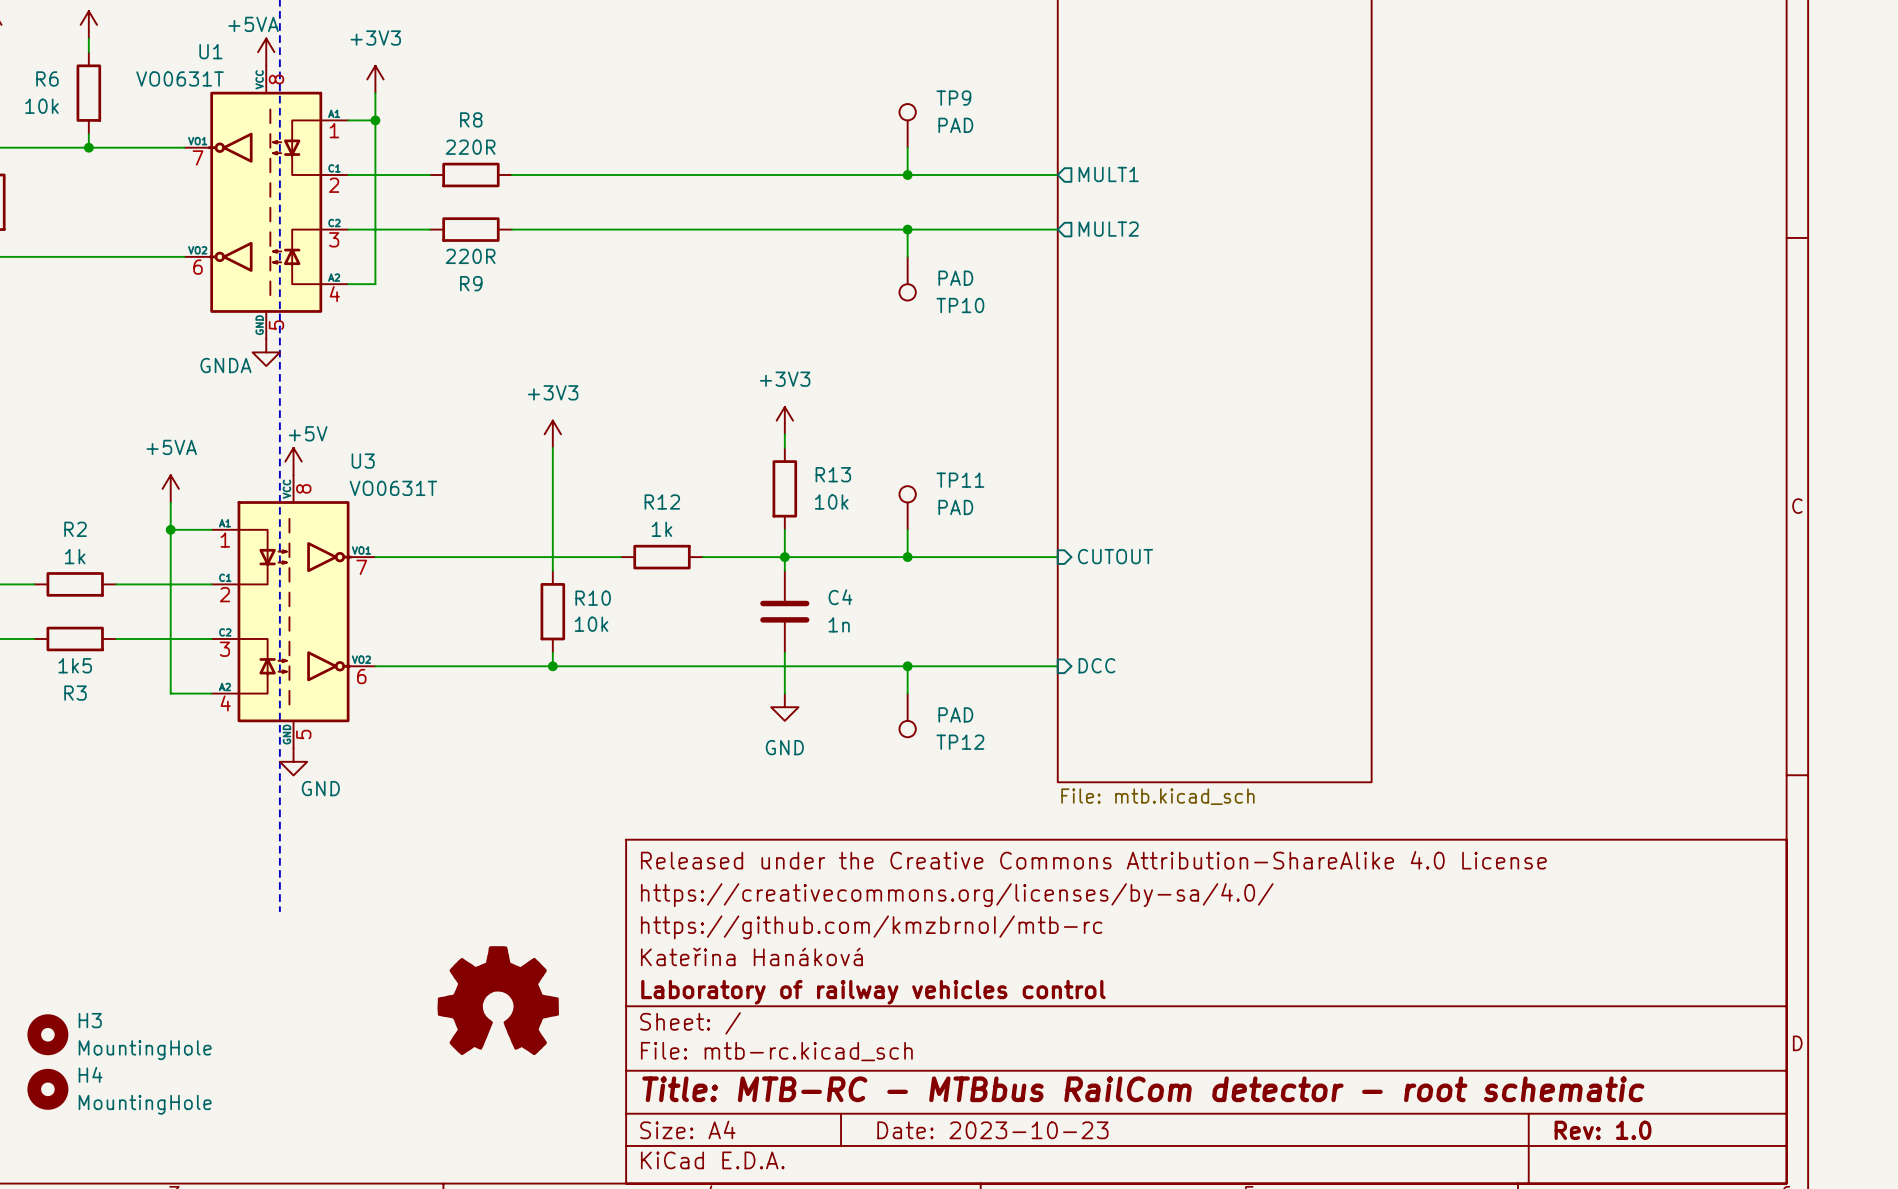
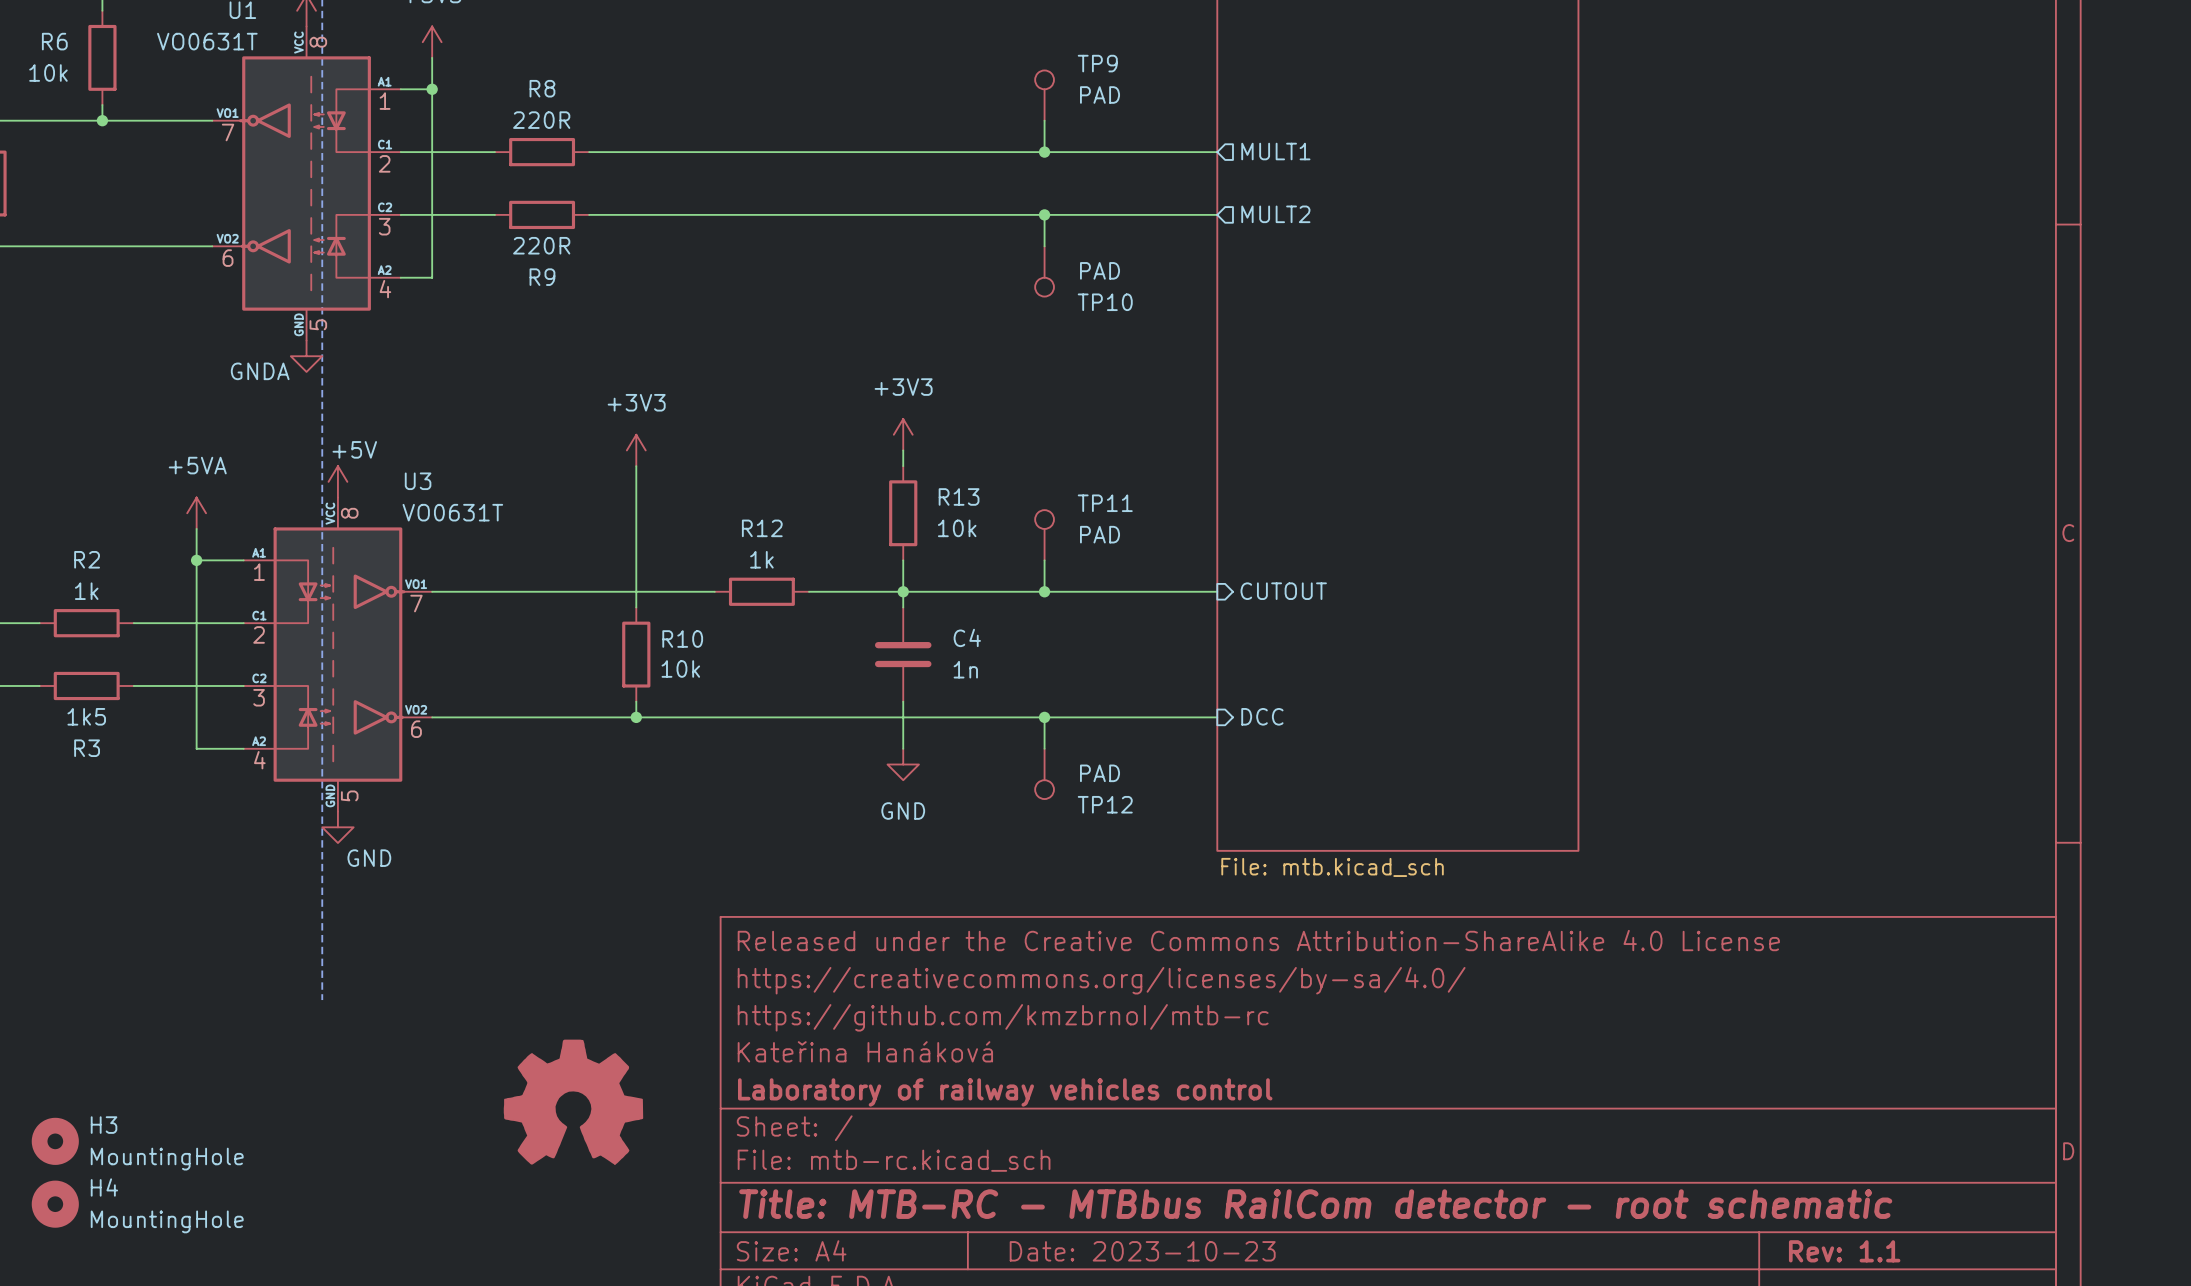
title block: Rev: 1.0 (1603, 1130) -> Rev: 1.1 (1844, 1251)

